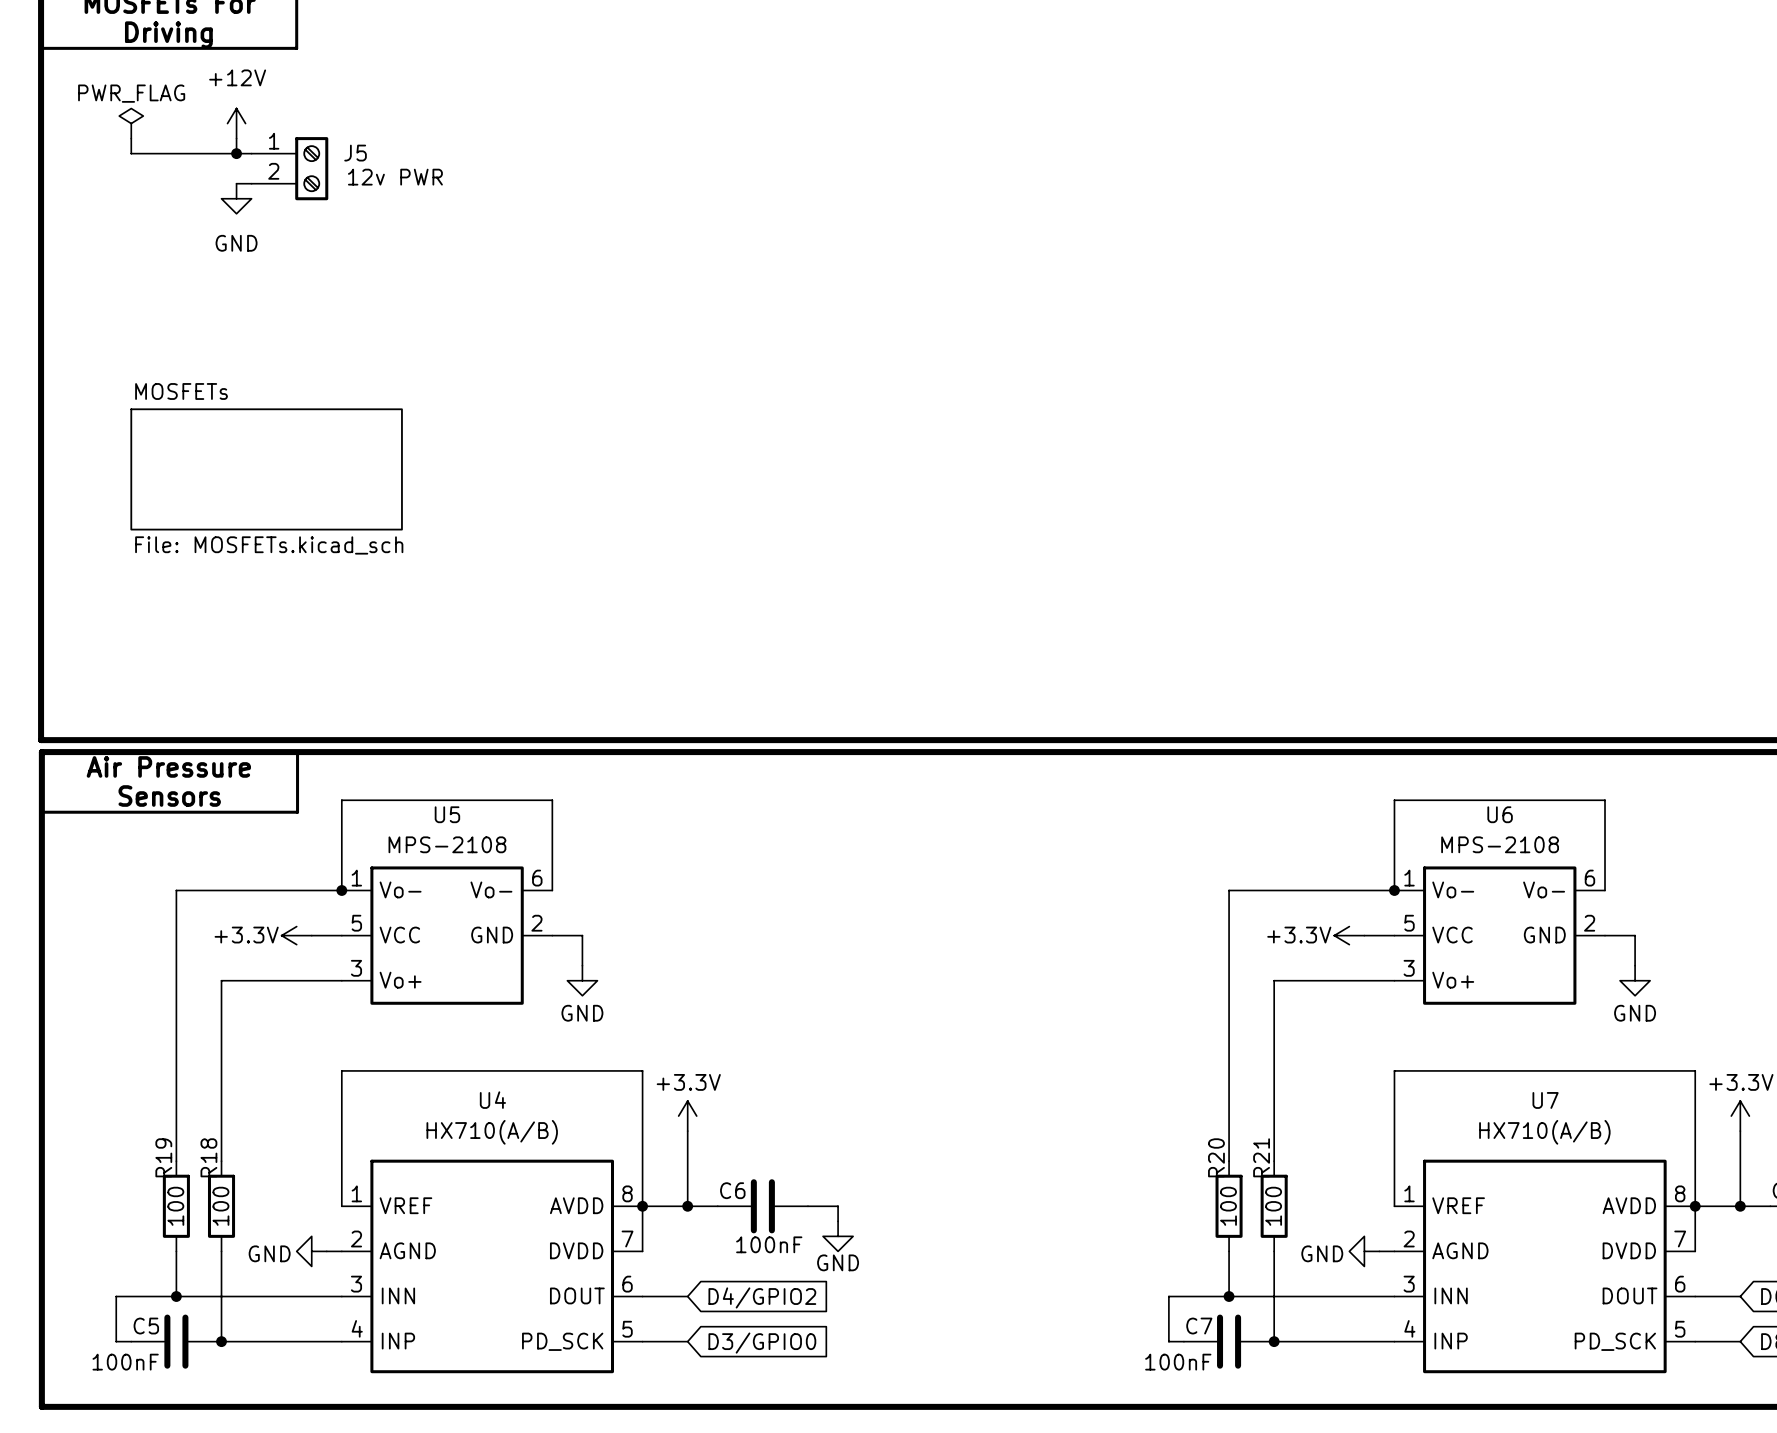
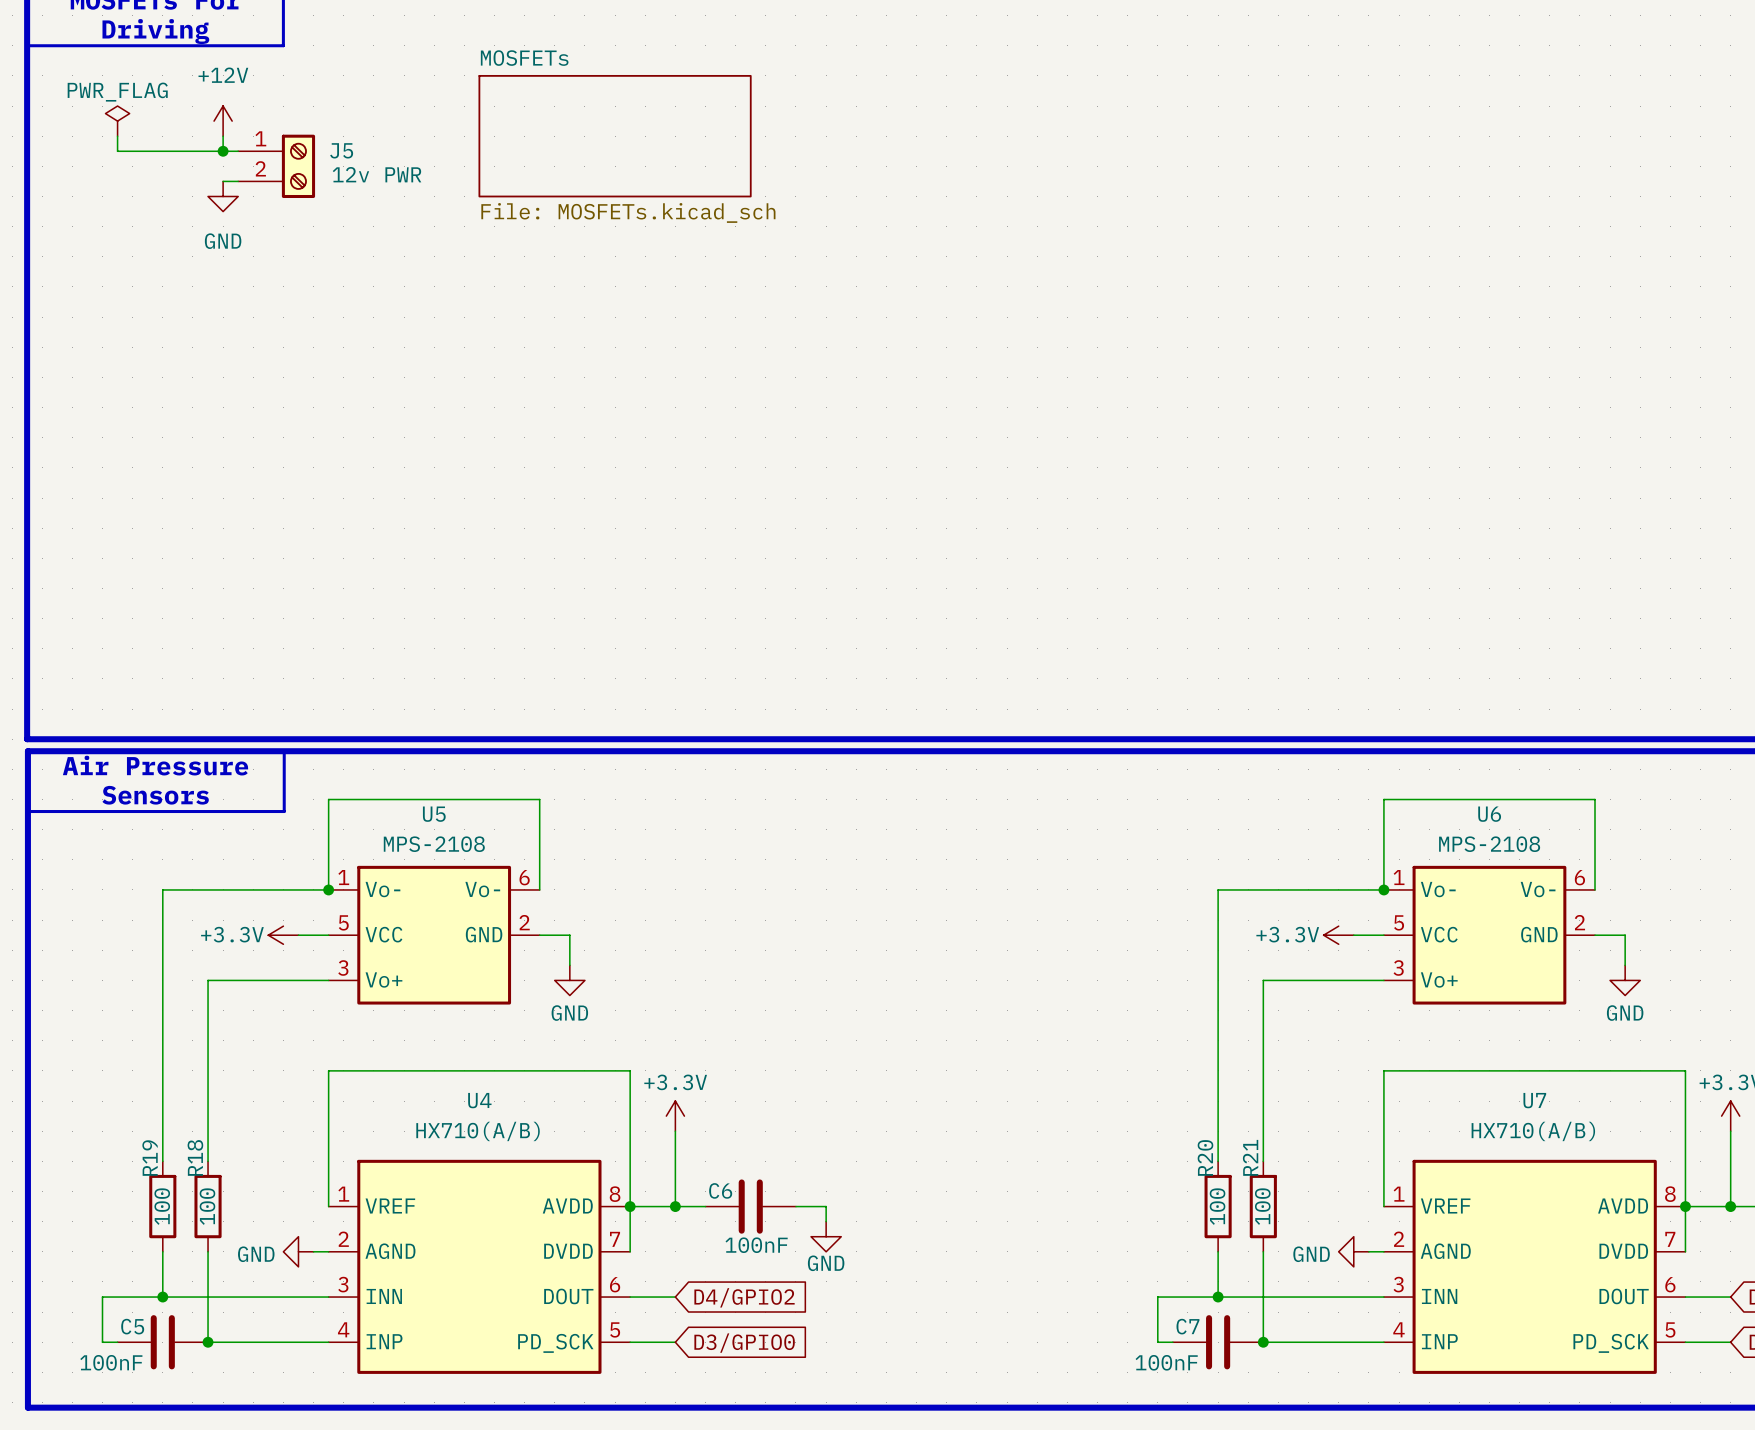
sheet MOSFETs: none -> File: MOSFETs.kicad_sch (615, 136)
sheet MOSFETs: File: MOSFETs.kicad_sch (266, 469) -> none

